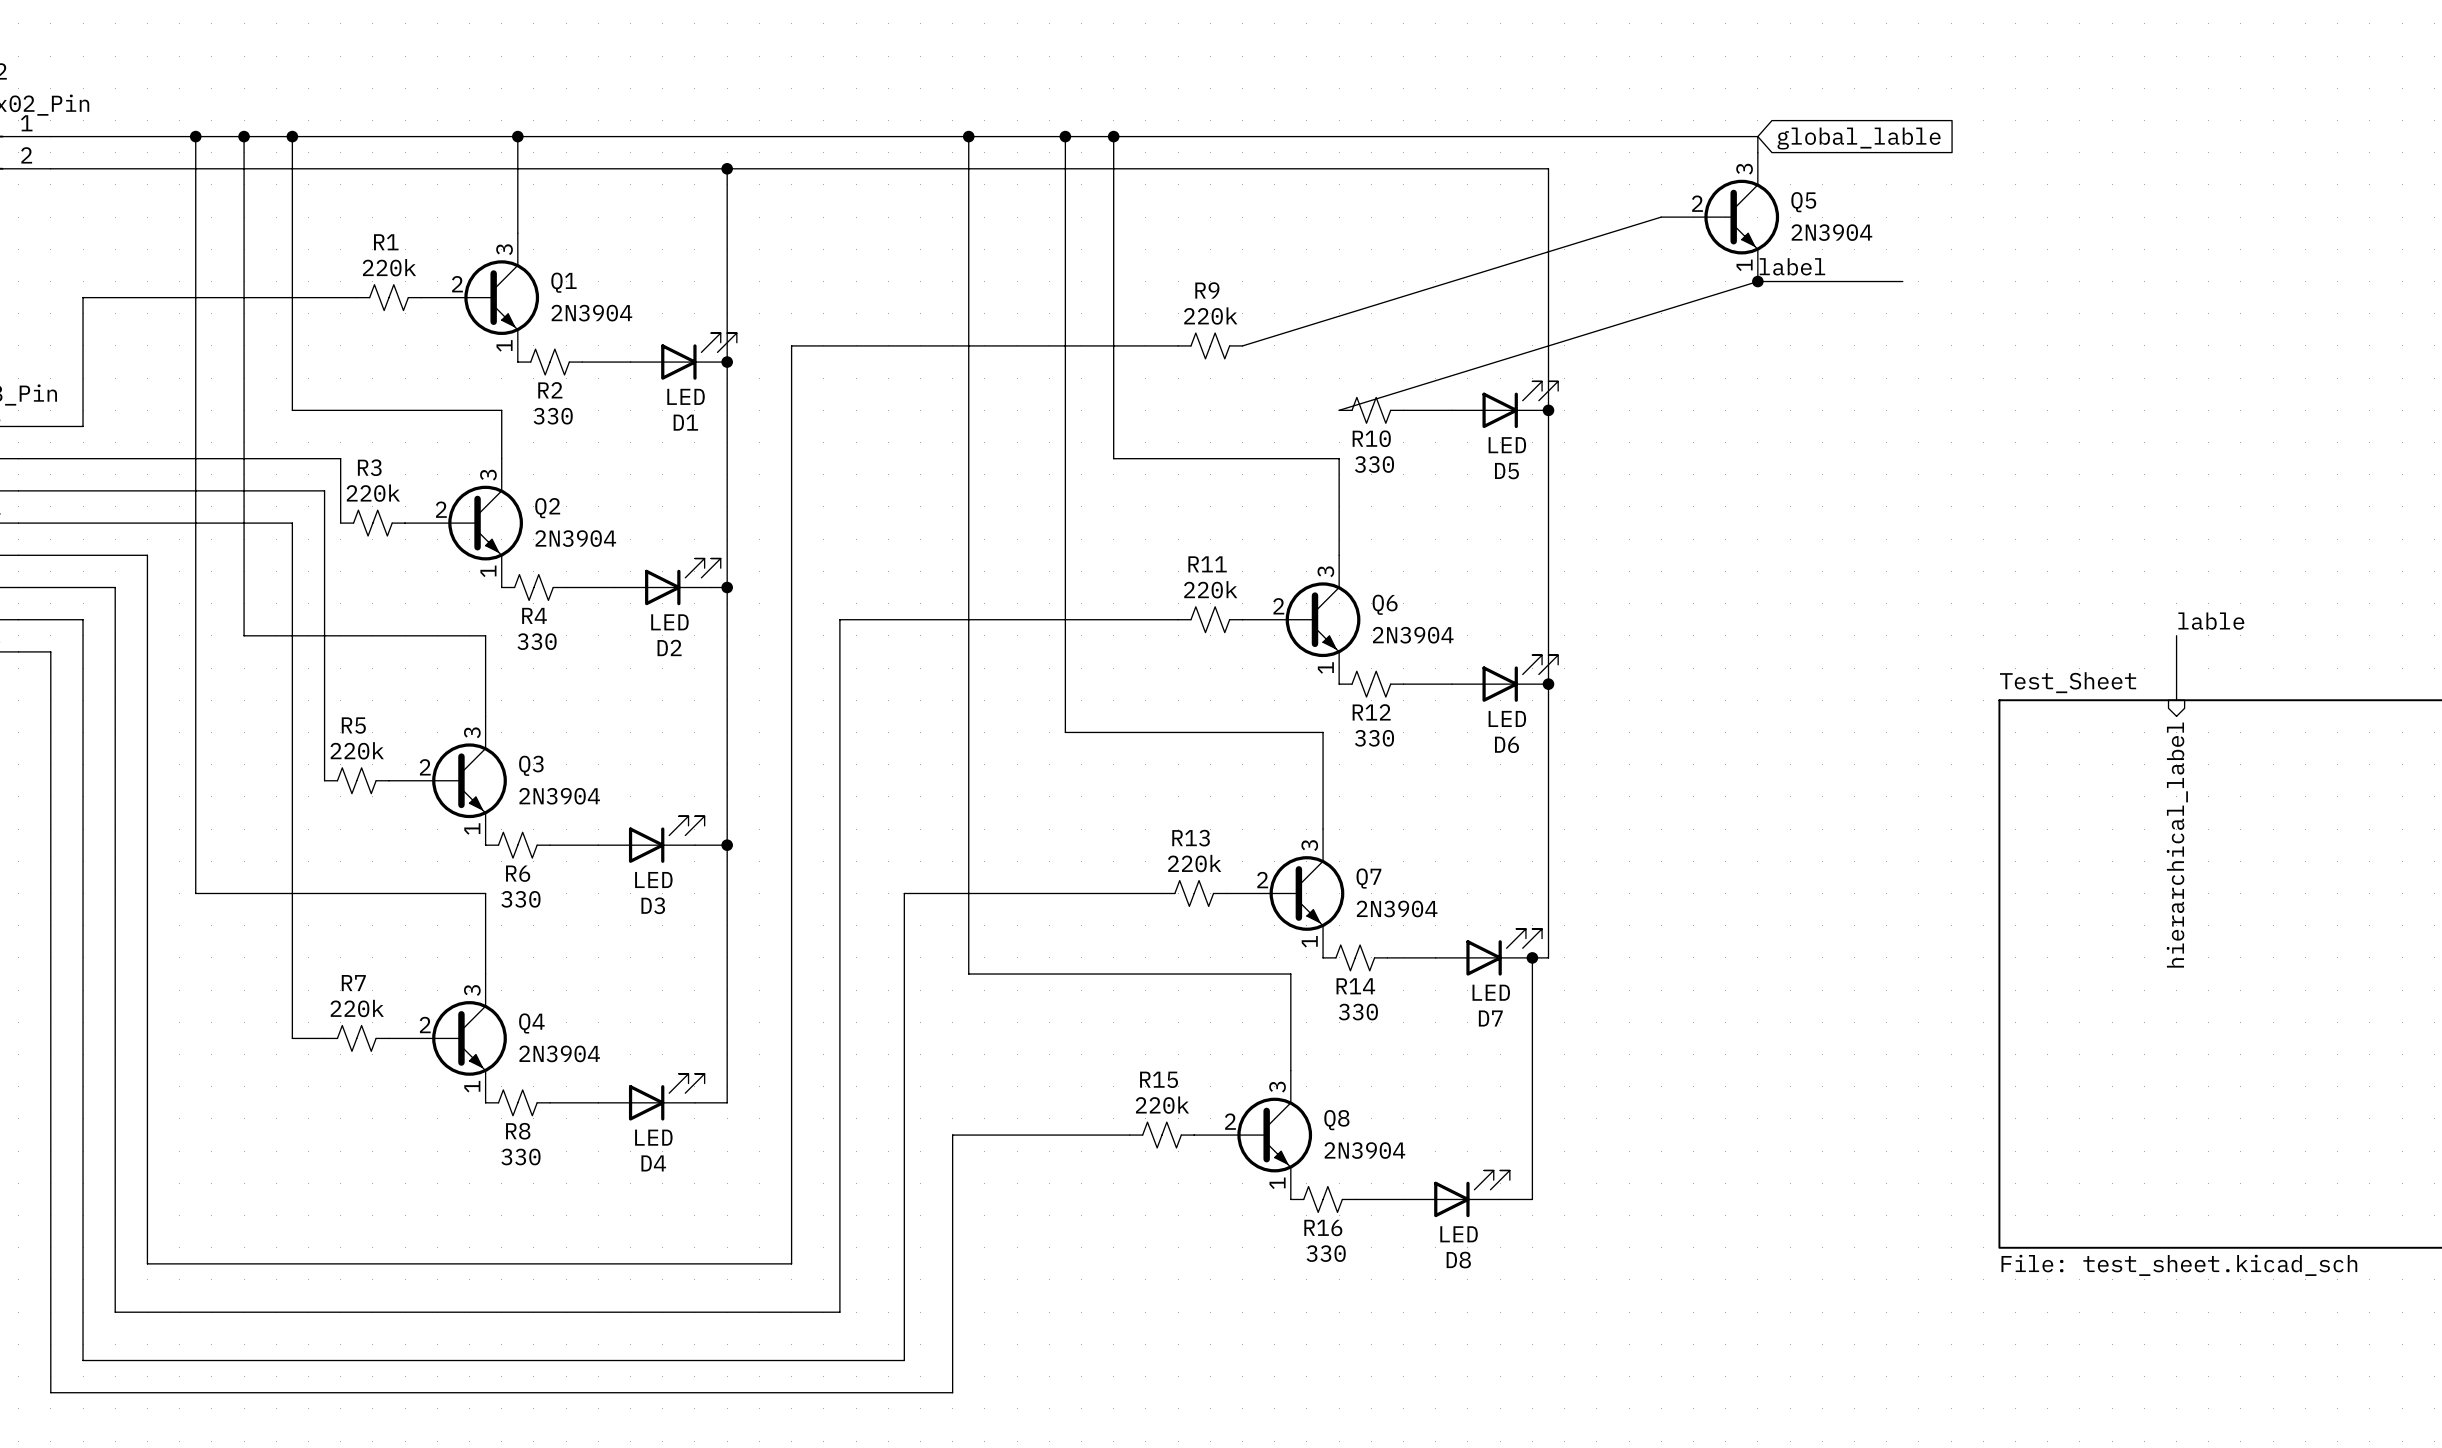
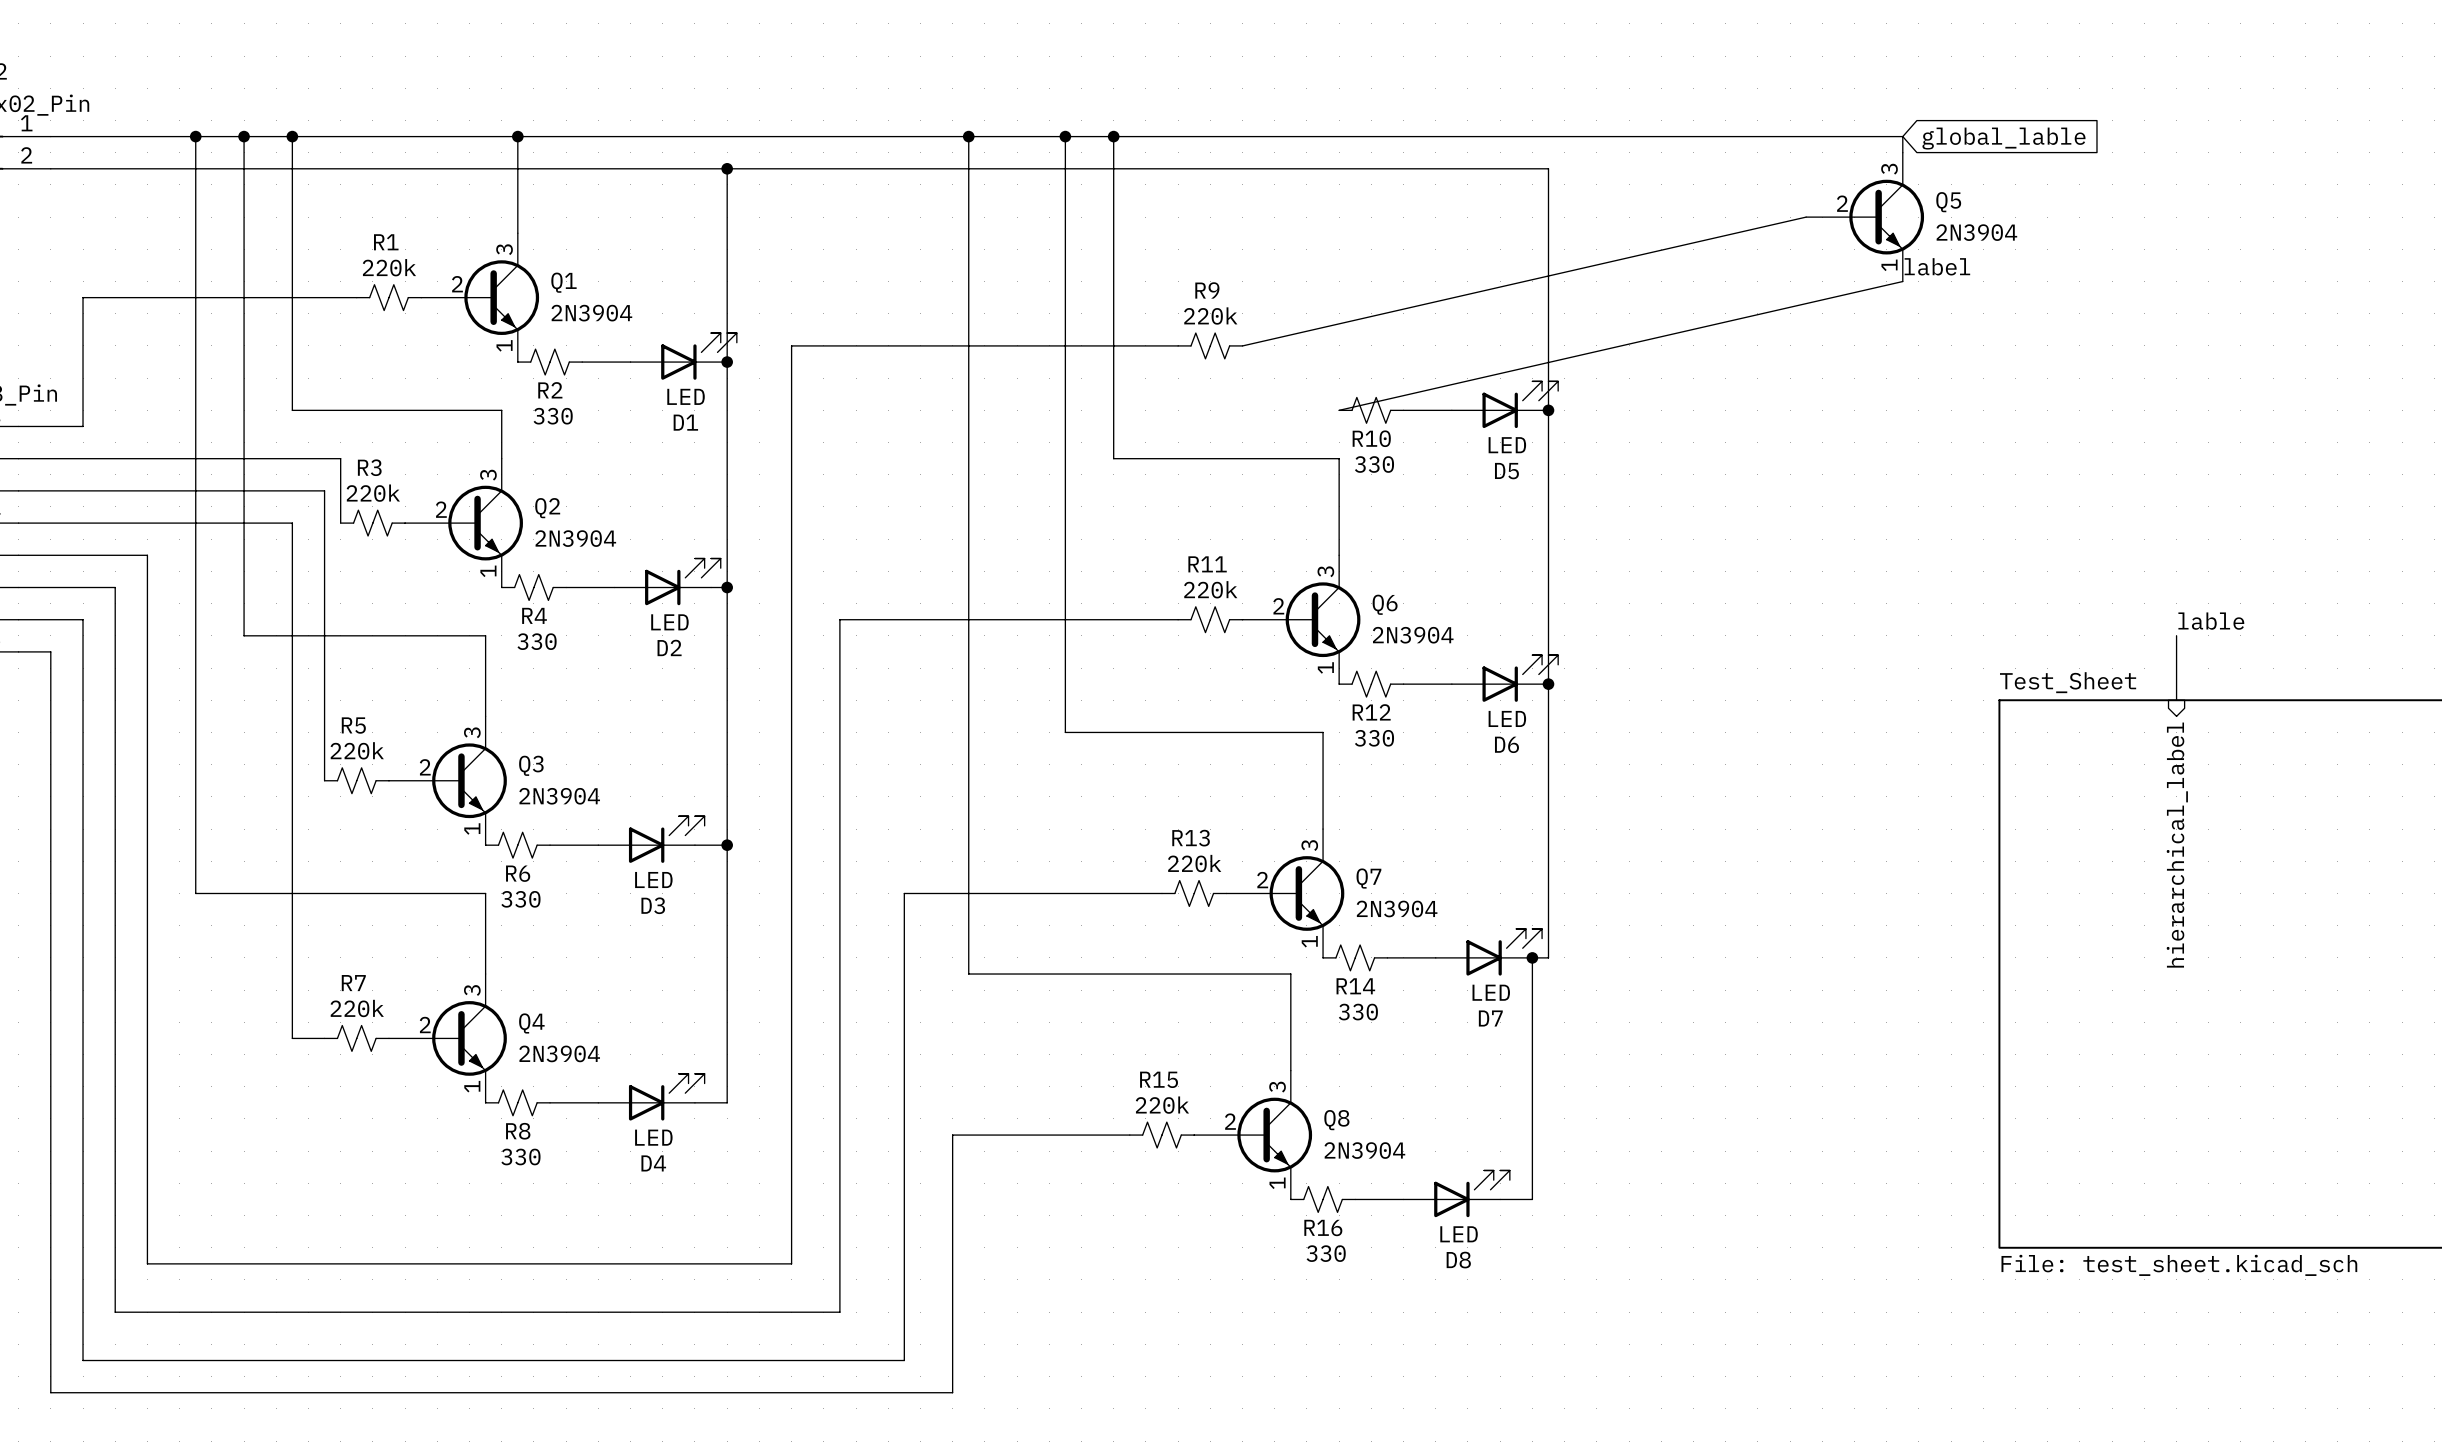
wire: (1757, 136) (1757, 152) -> (1757, 136) (1902, 136) (1902, 152)
global label position: global_lable (1859, 138) -> global_lable (2003, 138)
wire: (1661, 217) (1242, 345) -> (1806, 217) (1242, 345)
Q5 position: (1720, 217) -> (1865, 217)
label position: label (1792, 266) -> label (1937, 266)
junction: (1757, 281) -> none
wire: (1902, 281) (1757, 281) (1339, 410) -> (1902, 281) (1339, 410)

